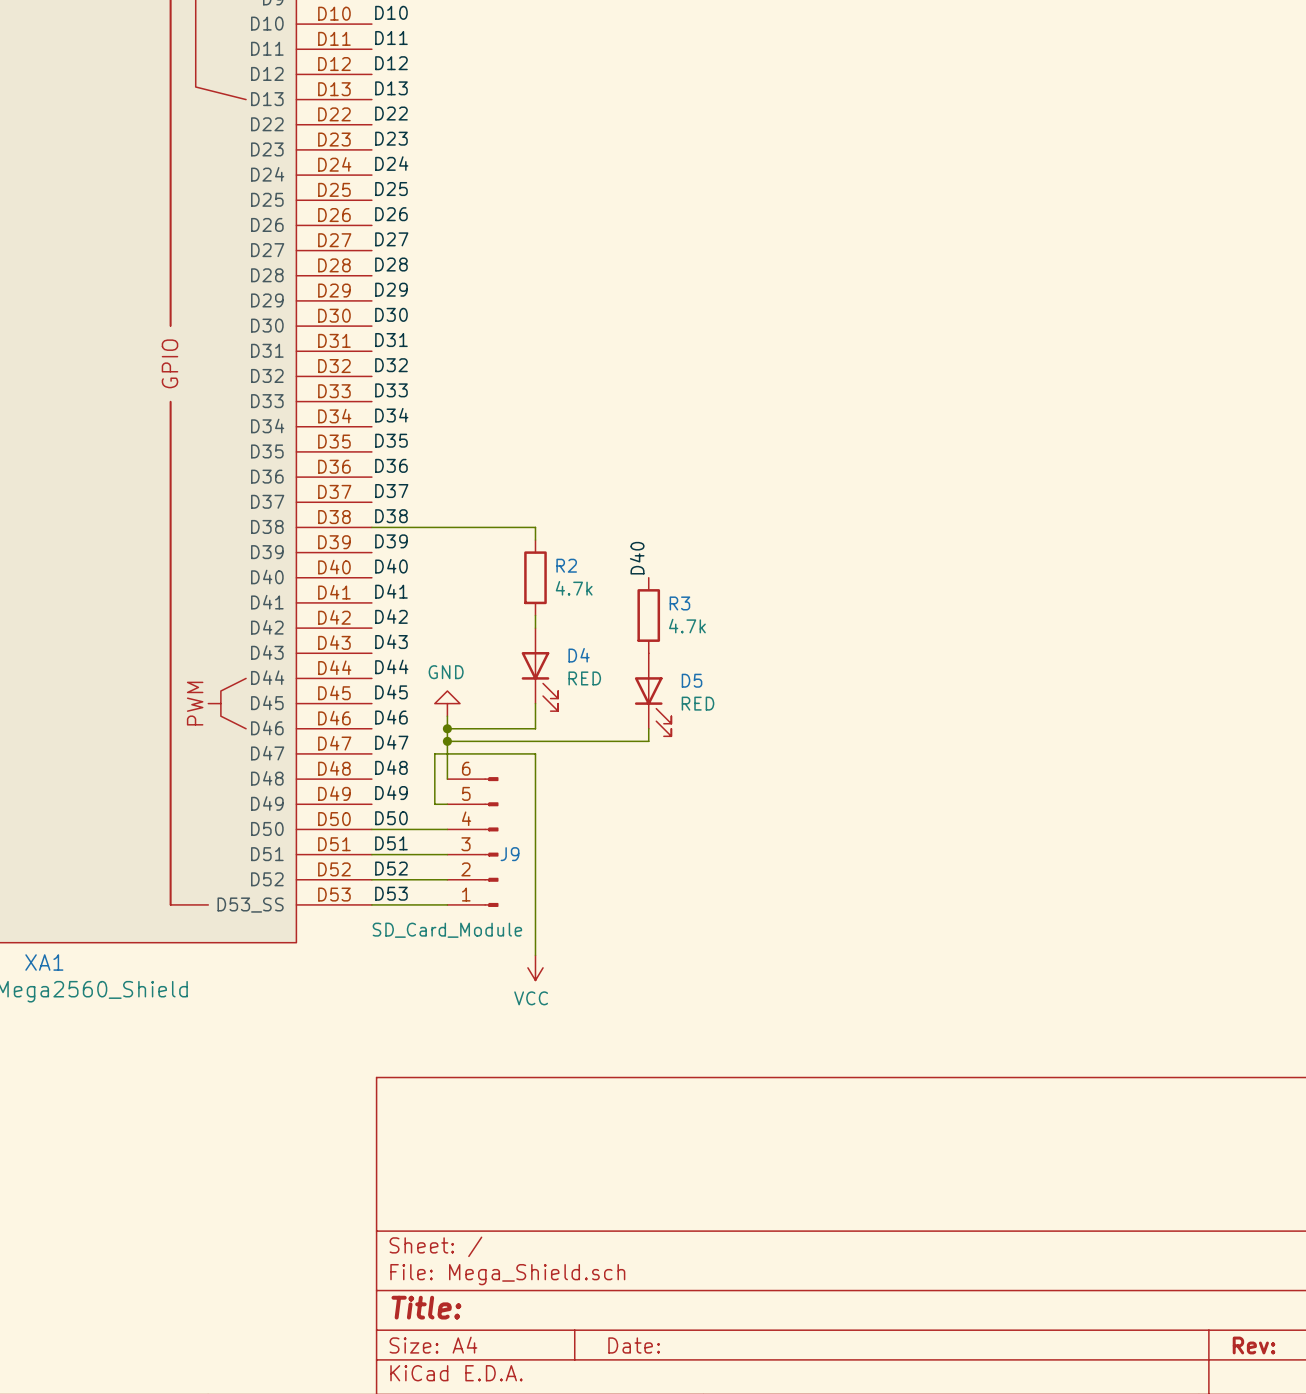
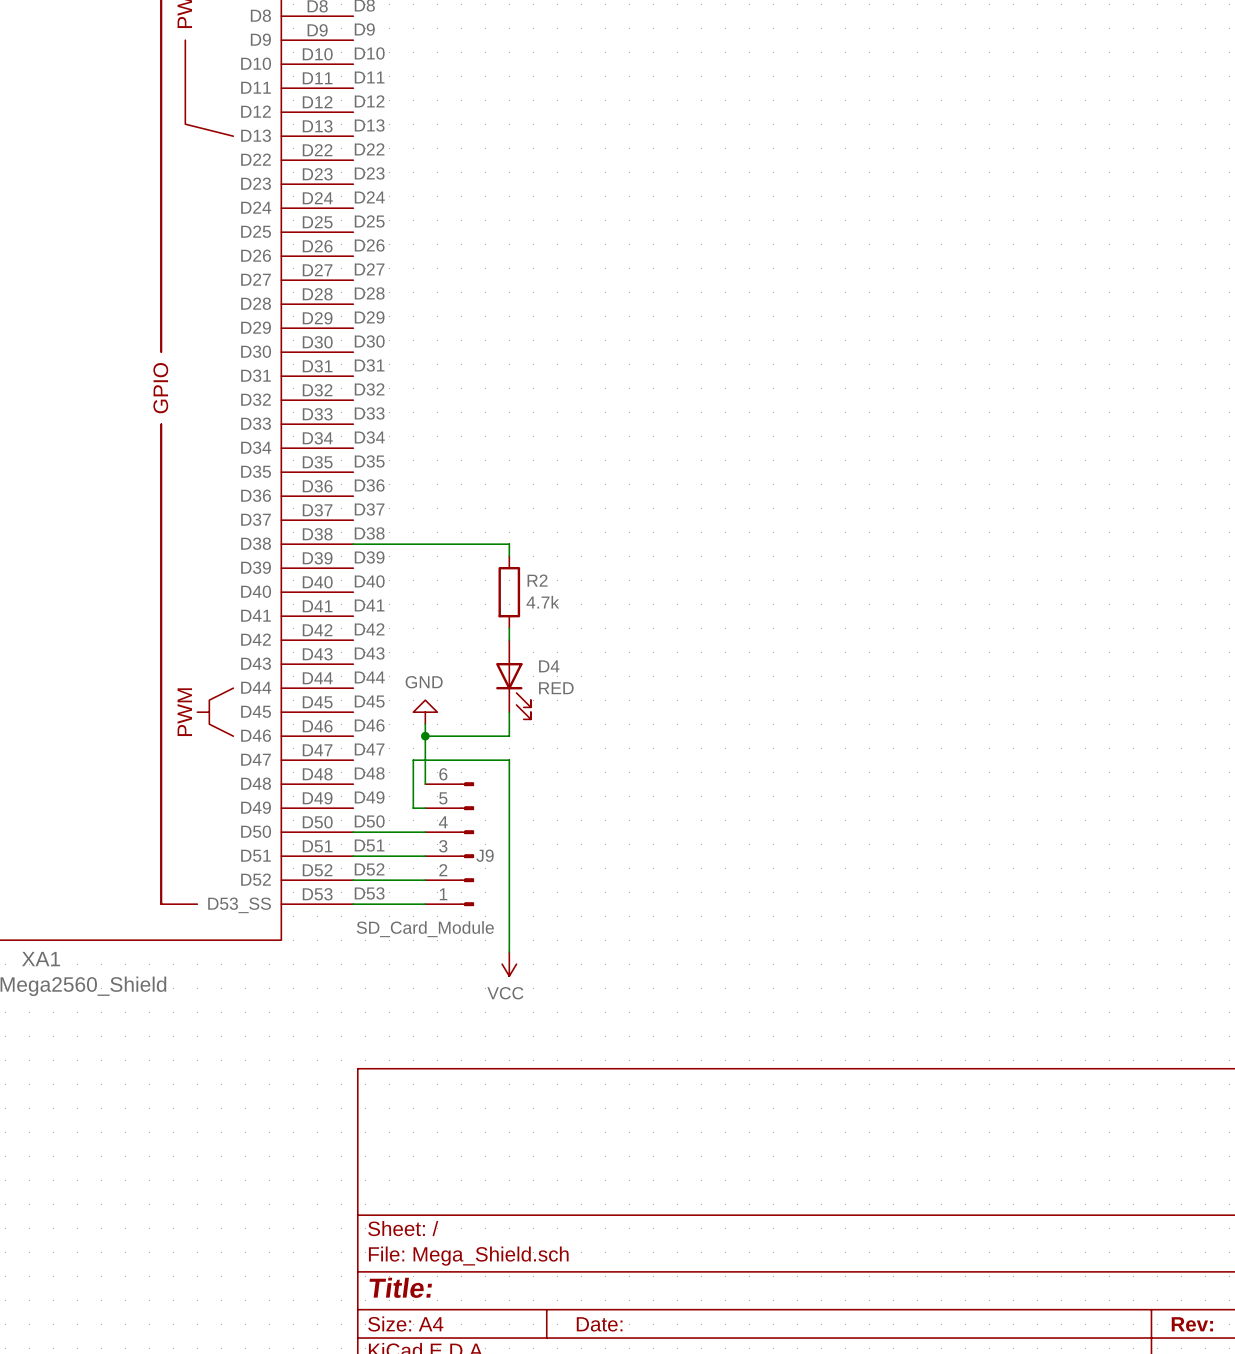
label: D40 (637, 558) -> none
R3: 4.7k (648, 615) -> none
D5: RED (653, 694) -> none
wire: (648, 728) (648, 741) (447, 741) -> none
junction: (447, 741) -> none

